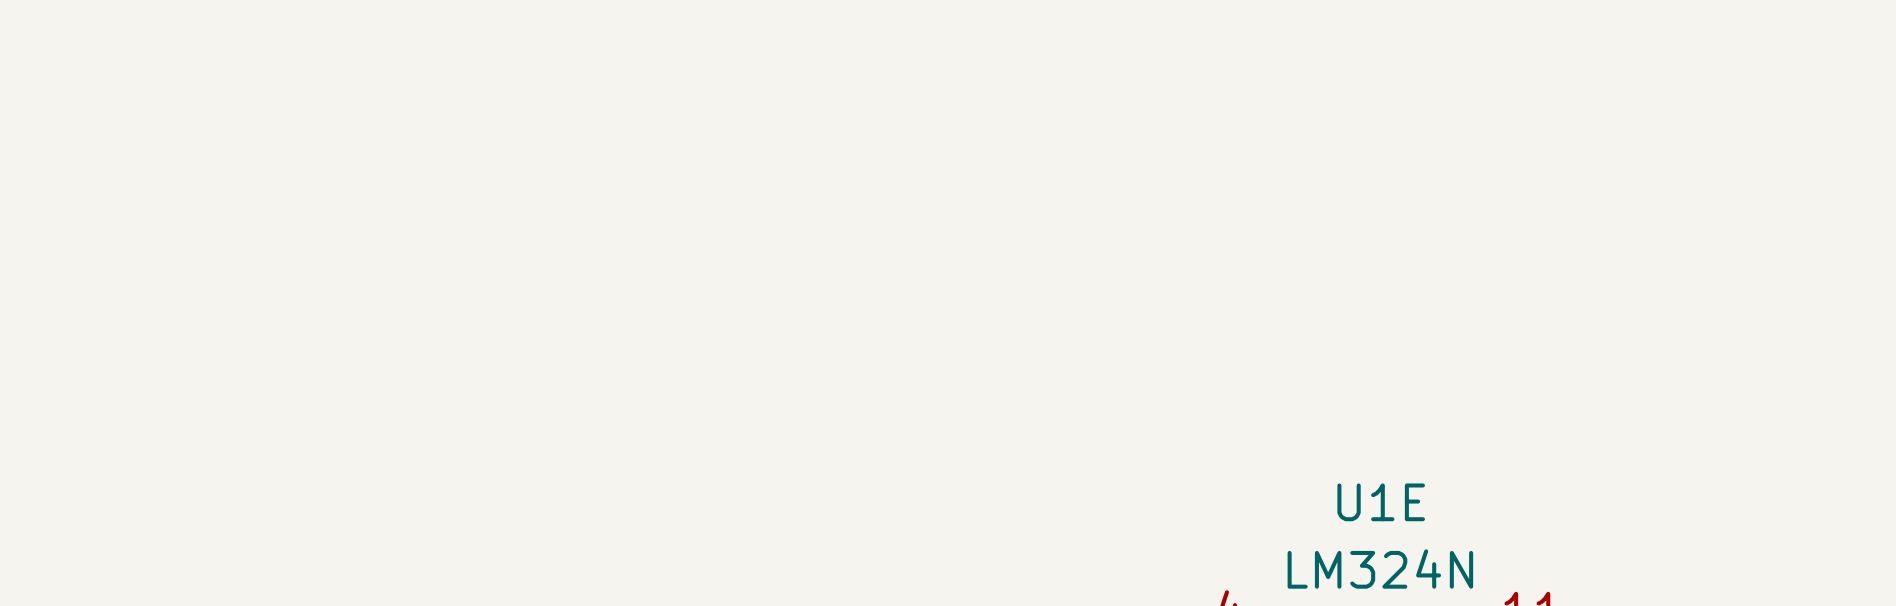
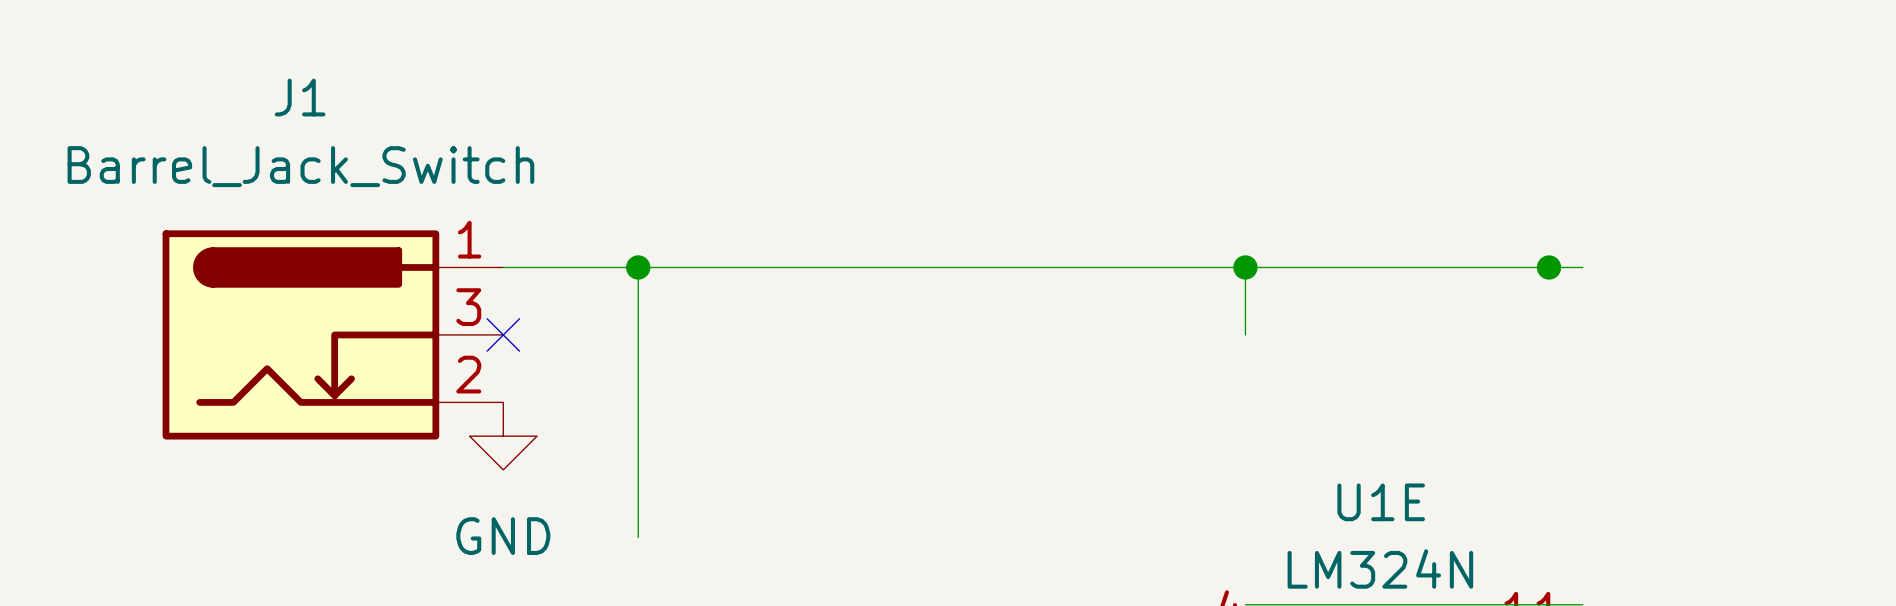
wire: none -> (503, 267) (1582, 267)
wire: none -> (638, 267) (638, 537)
junction: none -> (638, 267)
wire: none -> (1245, 267) (1245, 334)
junction: none -> (1245, 267)
junction: none -> (1549, 267)
J1: none -> Barrel_Jack_Switch (332, 334)
no-connect mark: none -> (503, 334)
power symbol: none -> GND (503, 436)
wire: none -> (1245, 604) (1582, 604)

